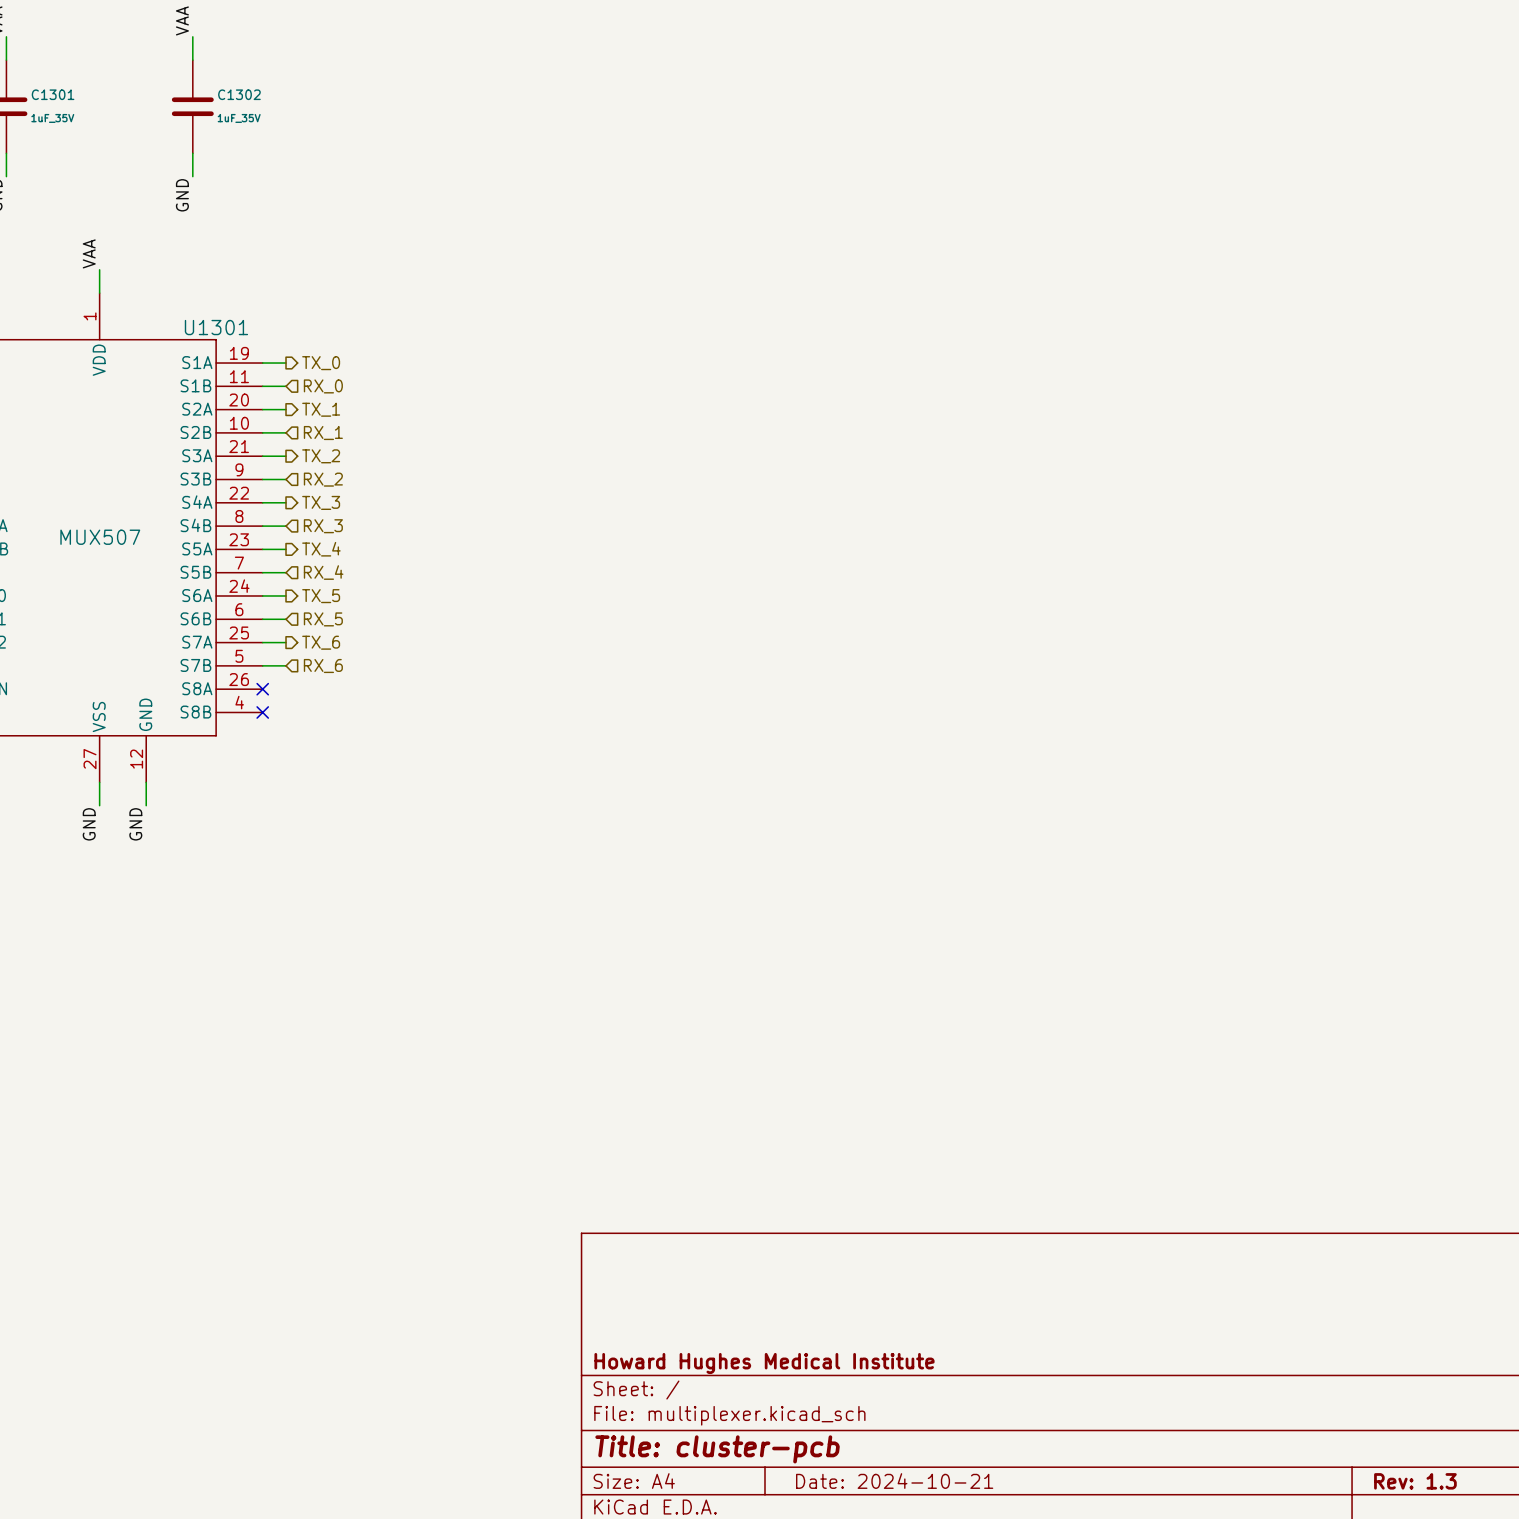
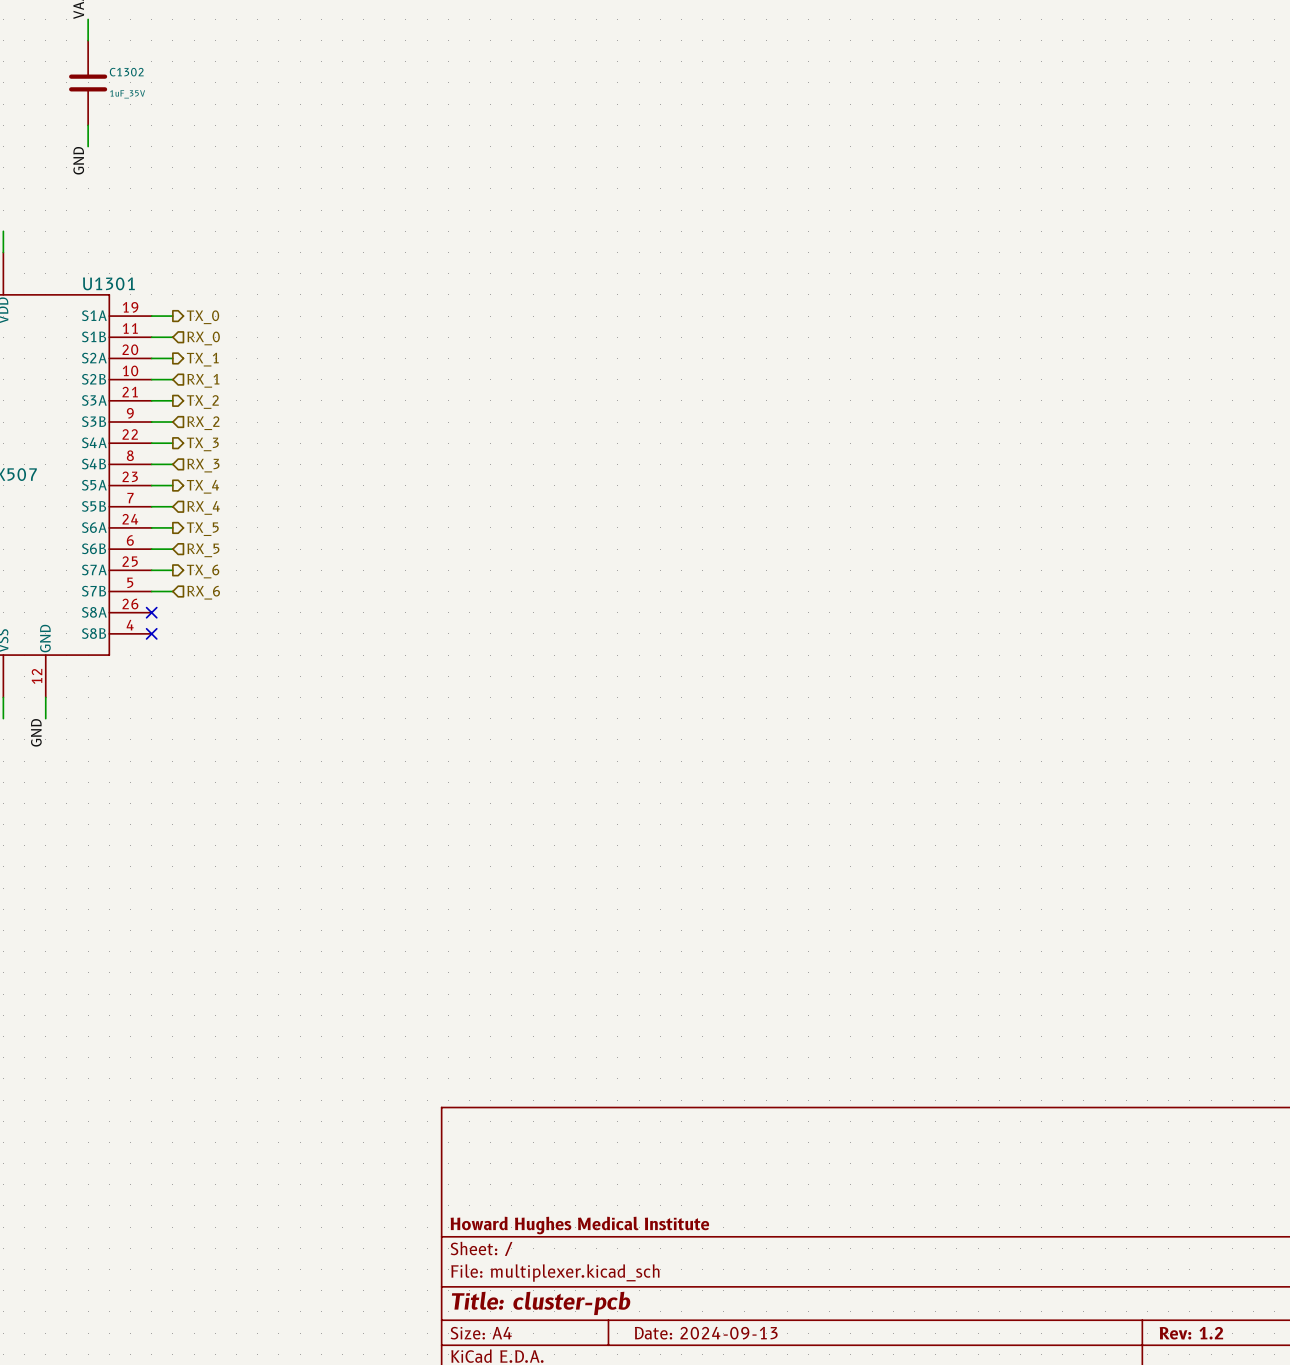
title block: Date: 2024-10-21 (894, 1481) -> Date: 2024-09-13 (706, 1333)
title block: Rev: 1.3 (1415, 1481) -> Rev: 1.2 (1191, 1333)

